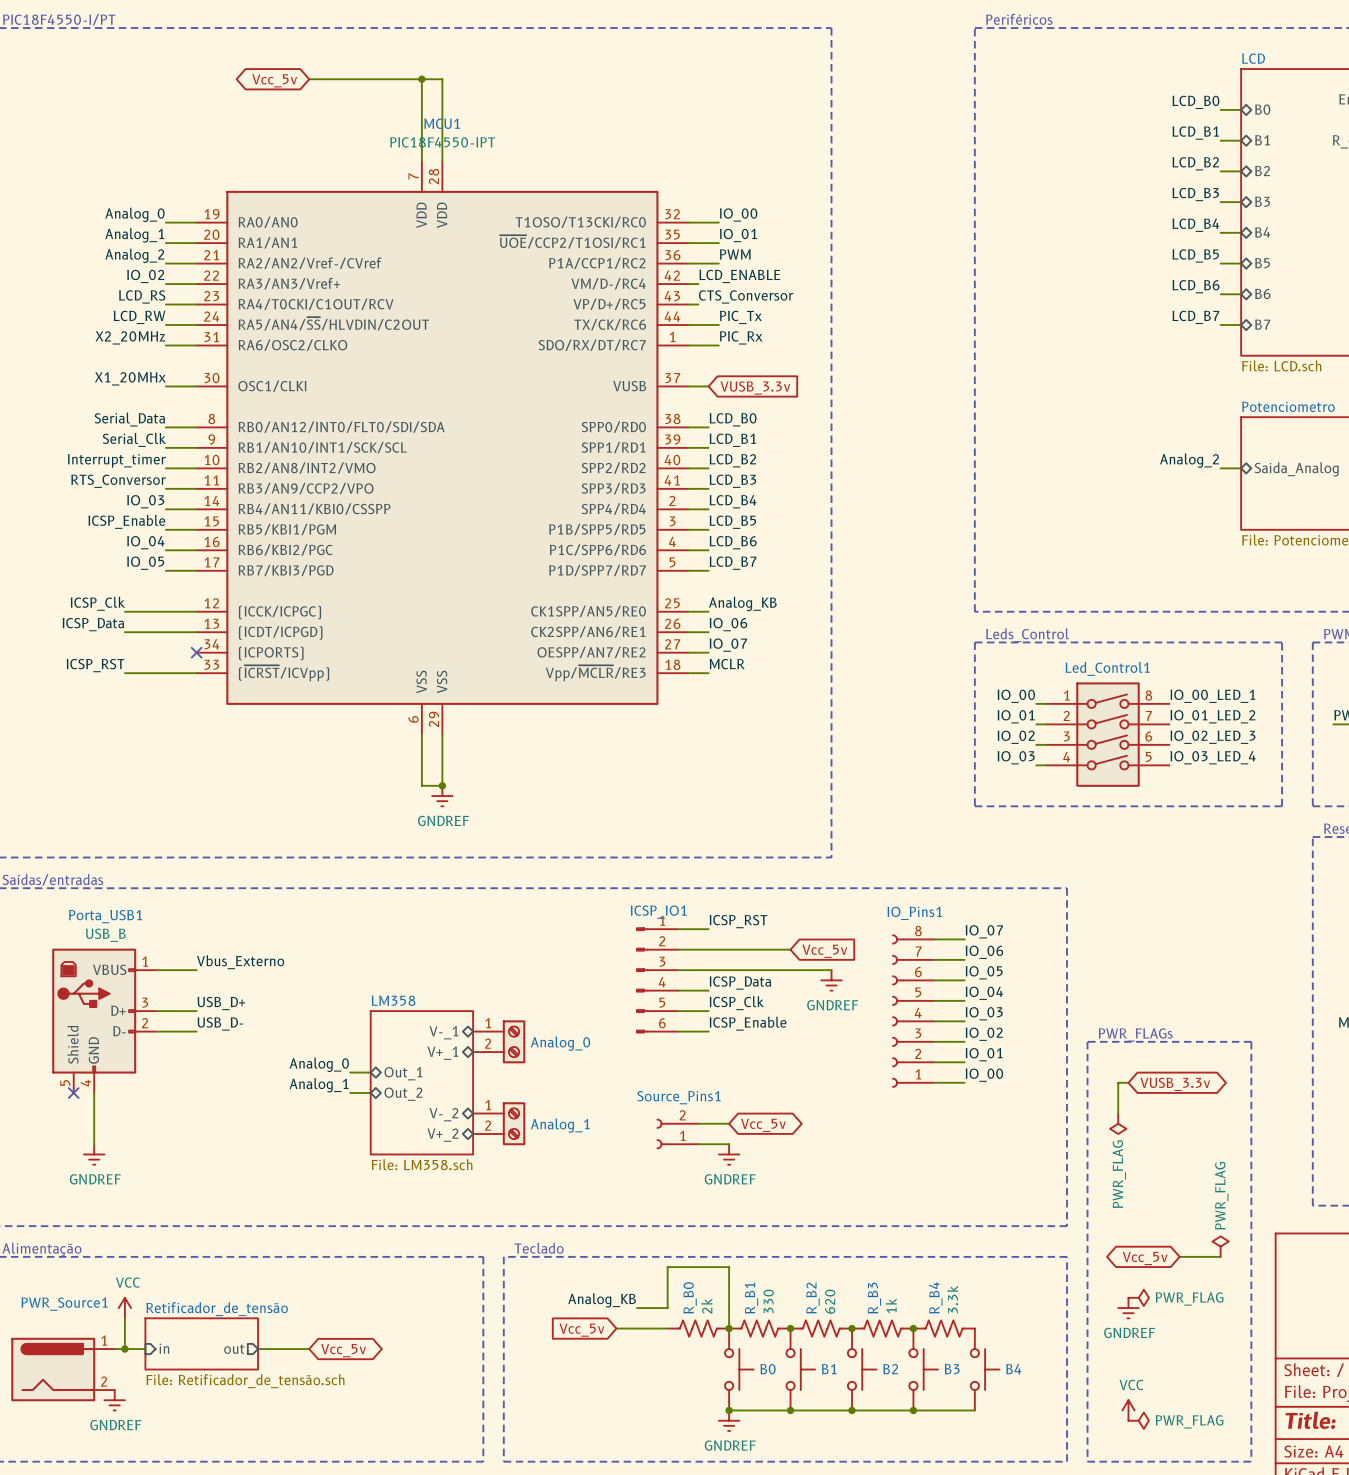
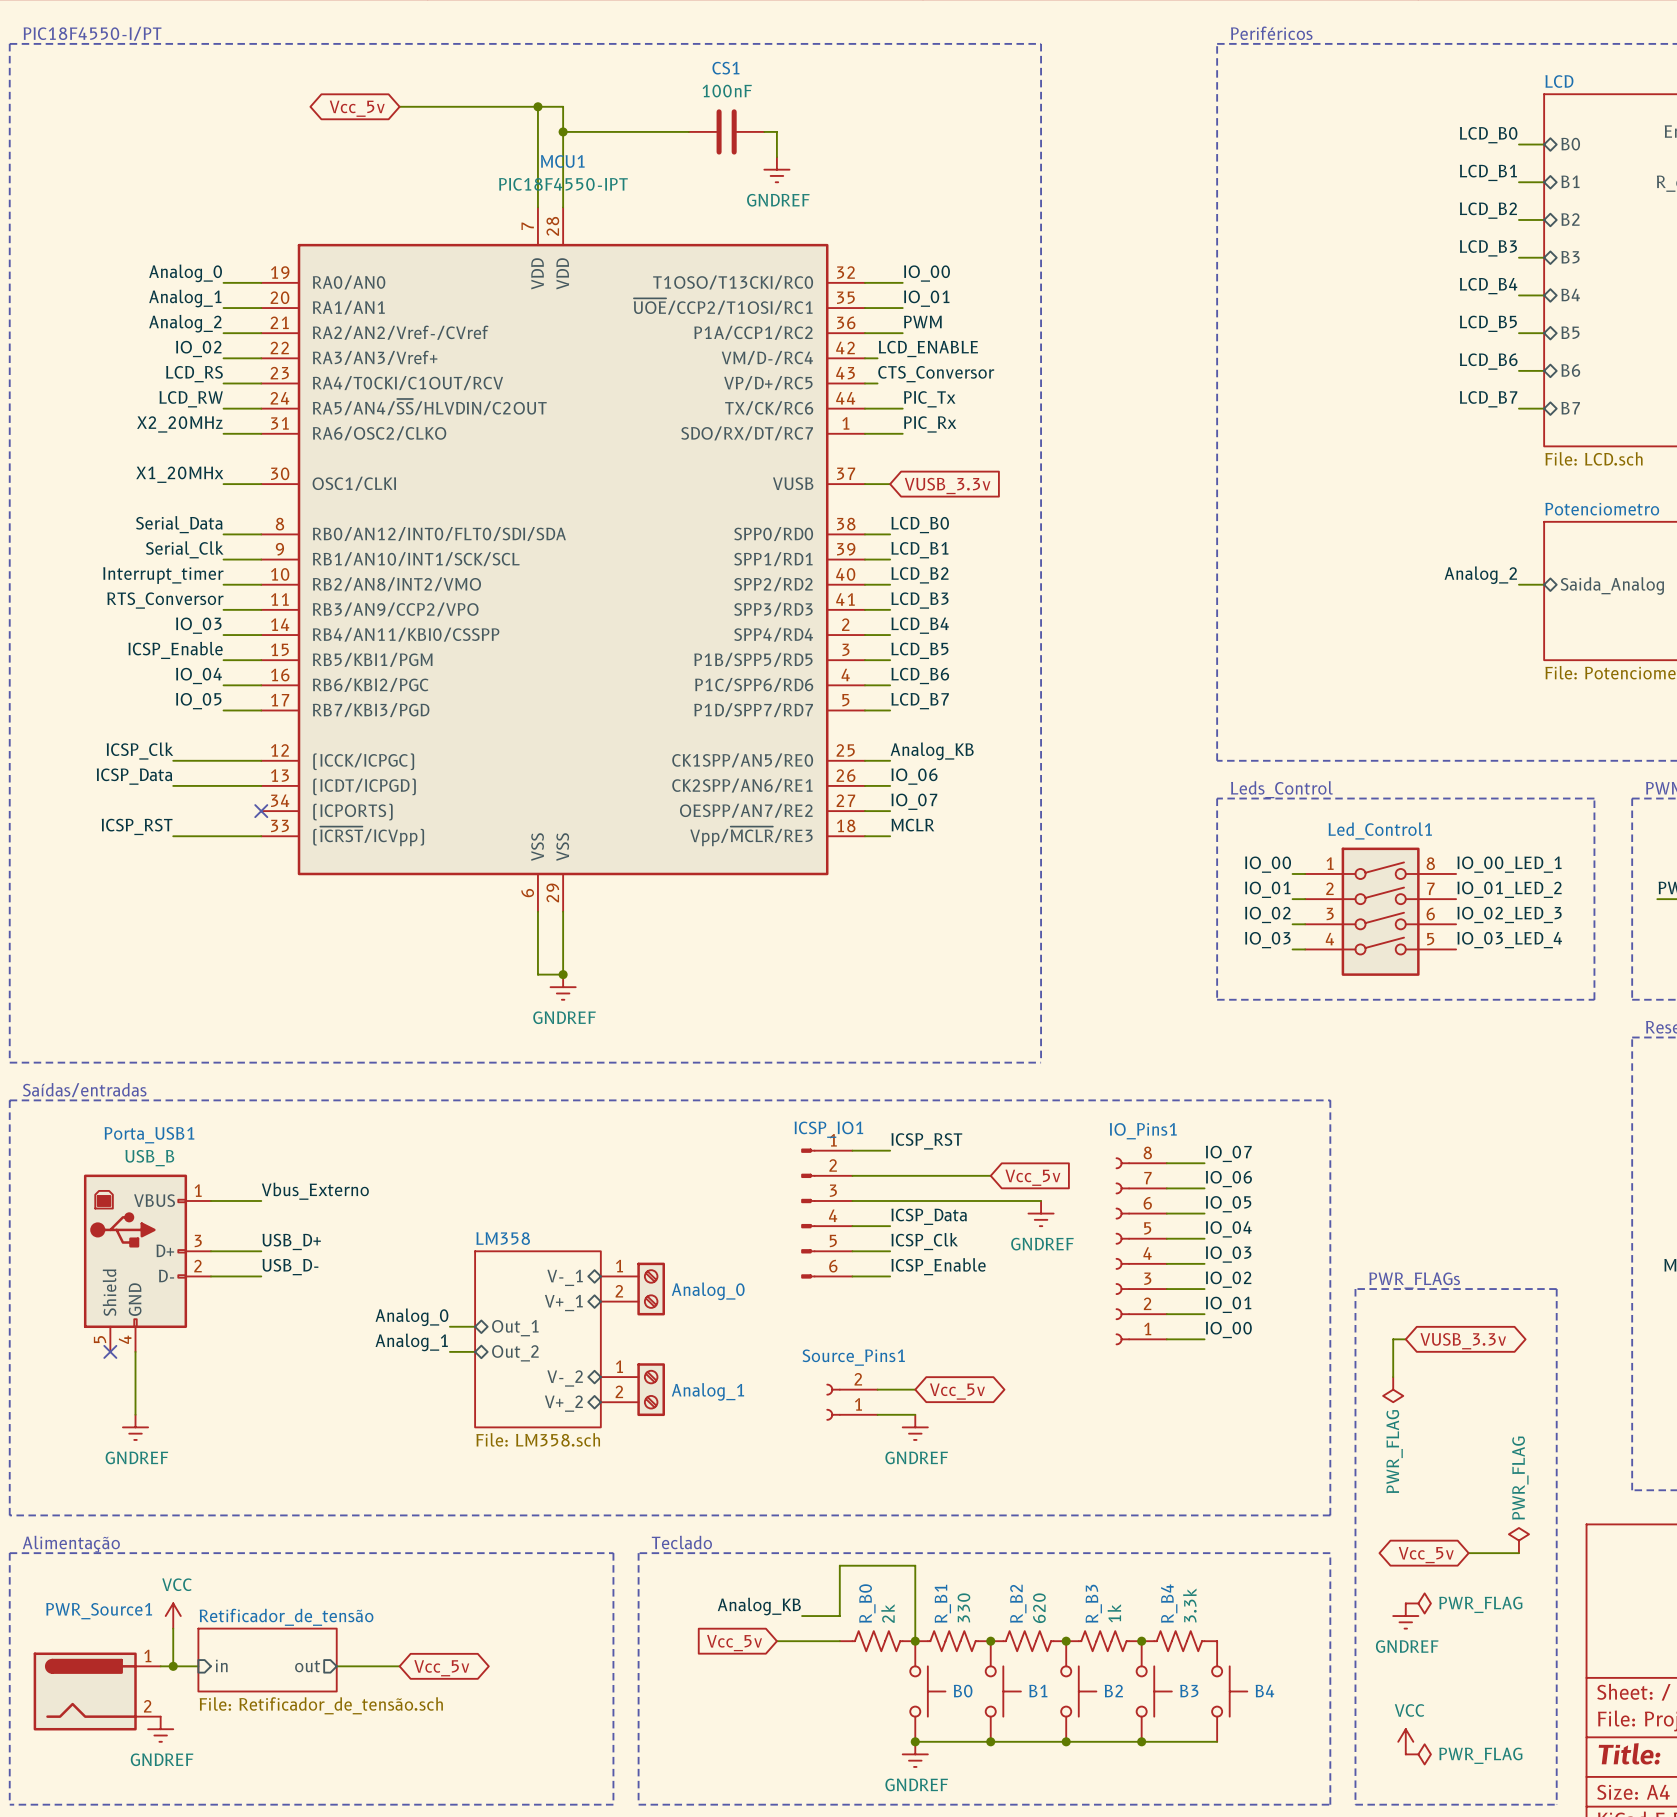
wire: none -> (563, 131) (688, 131)
junction: none -> (563, 131)
CS1: none -> 100nF (726, 131)
wire: none -> (764, 131) (776, 131) (776, 157)
power symbol: none -> GNDREF (776, 169)

